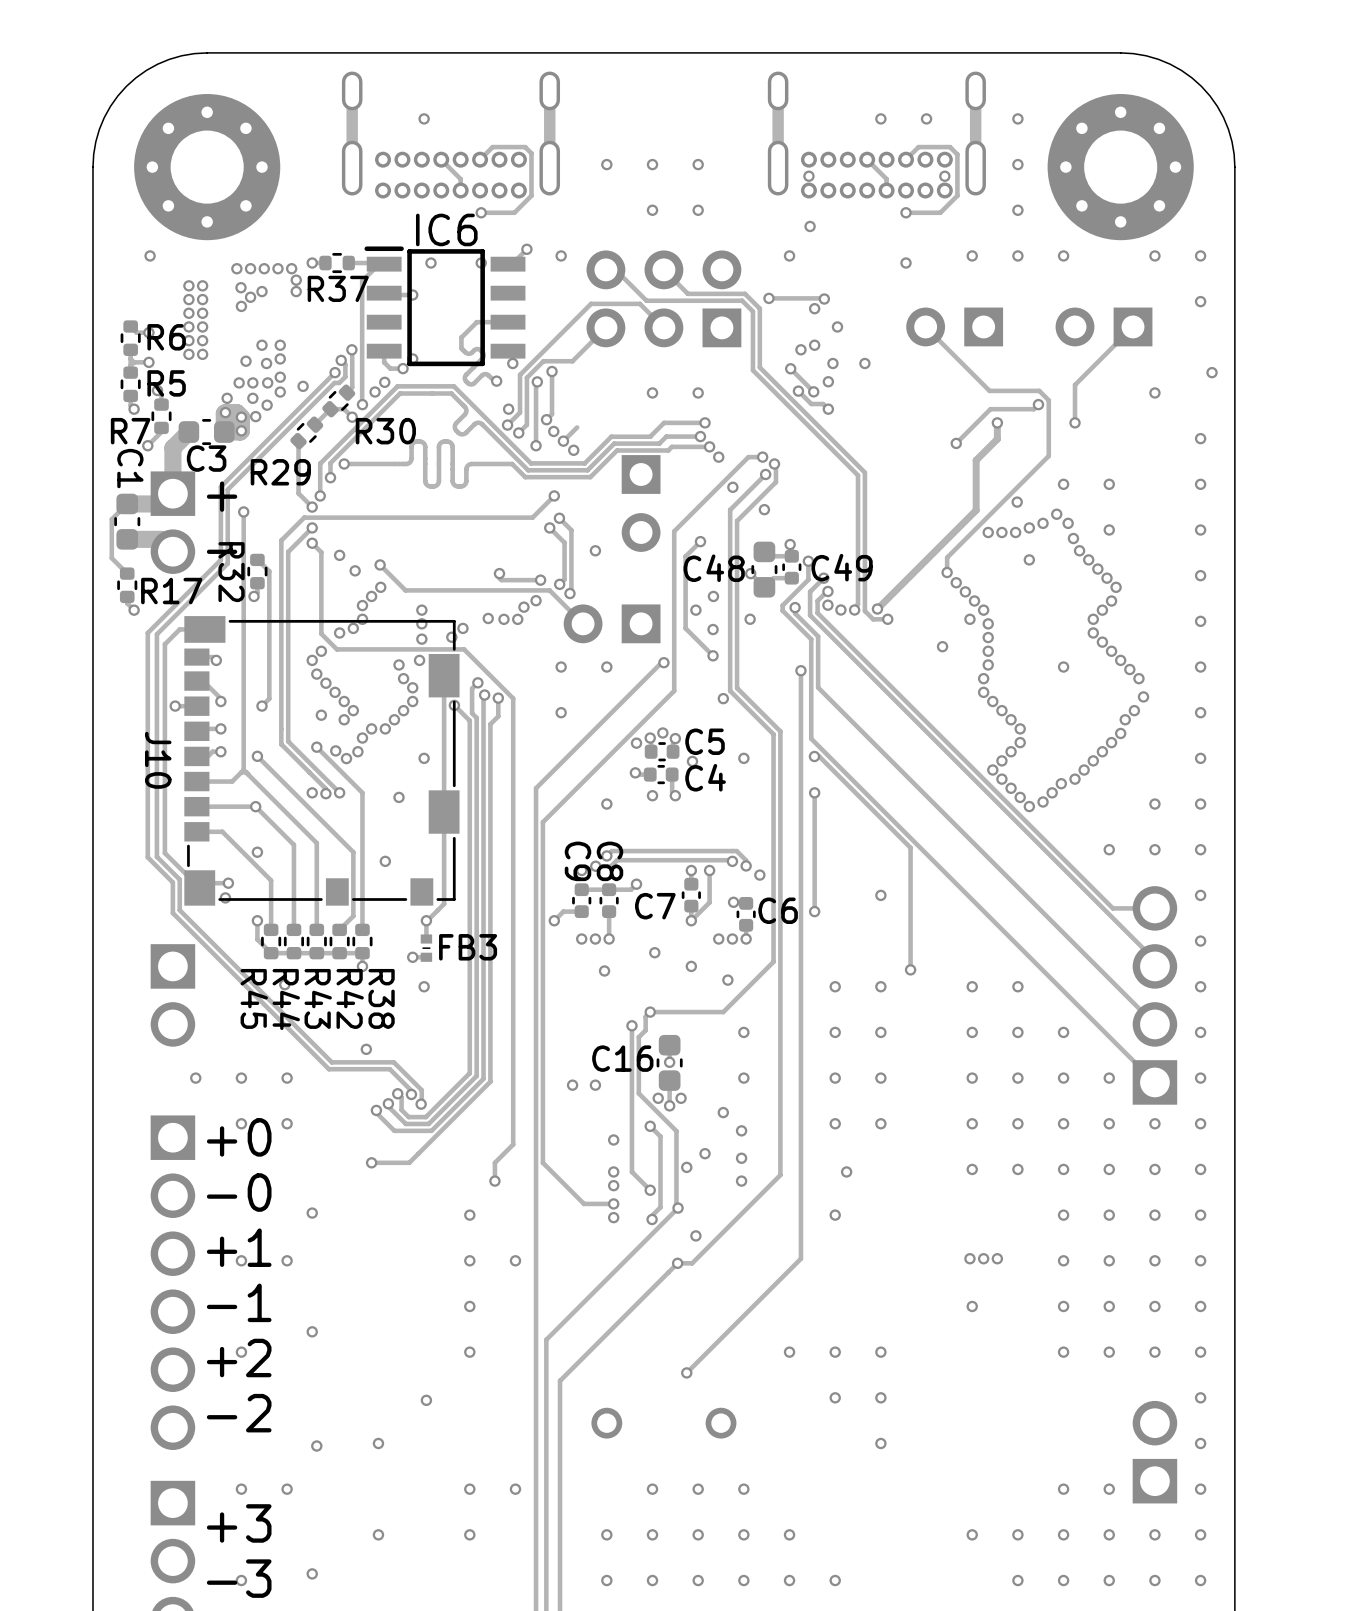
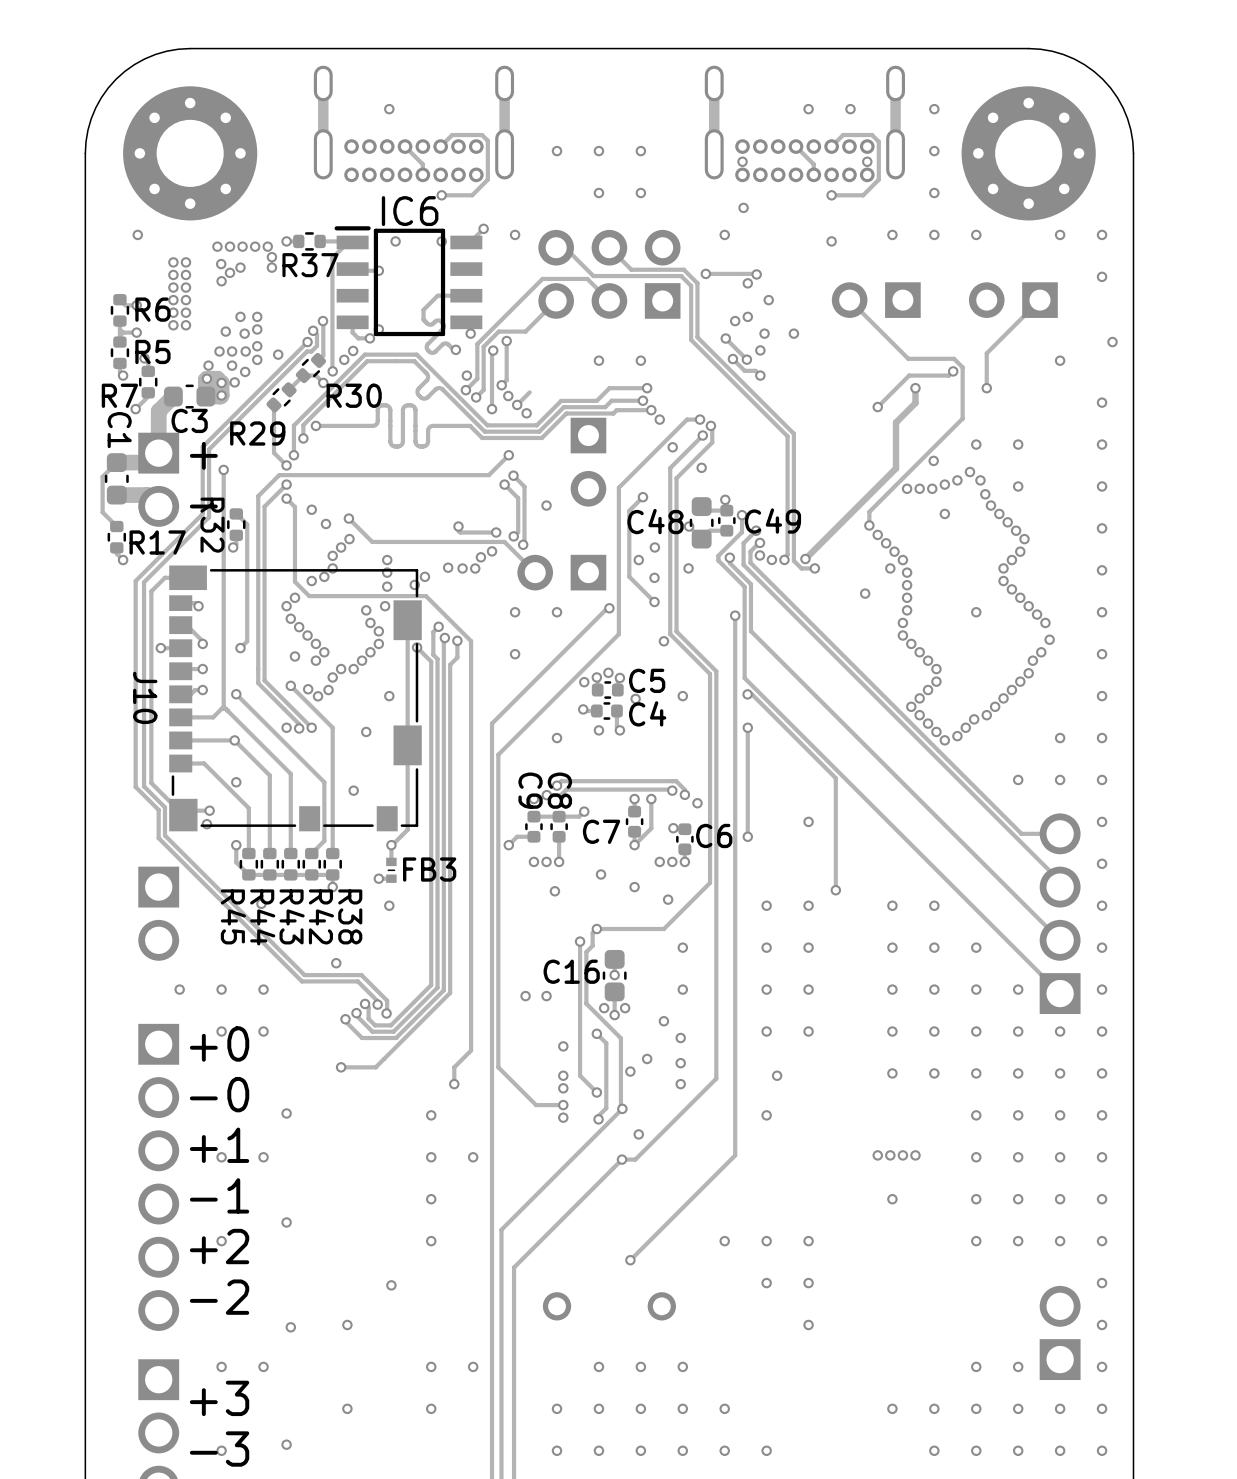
via: none -> (877, 1155)

